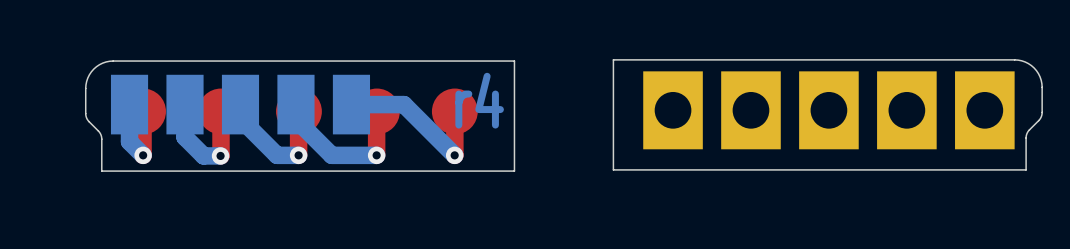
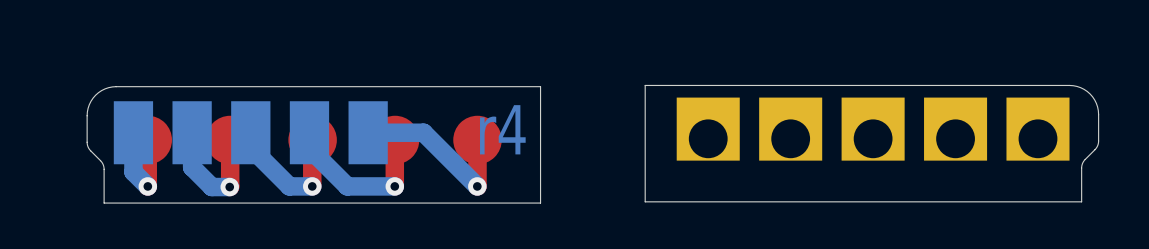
part footprint: [643, 71, 703, 150] -> [676, 97, 740, 161]
part footprint: [721, 71, 781, 150] -> [759, 97, 823, 161]
part footprint: [799, 71, 859, 150] -> [841, 97, 905, 161]
part footprint: [877, 71, 937, 150] -> [924, 97, 988, 161]
part footprint: [955, 71, 1015, 150] -> [1006, 97, 1070, 161]

